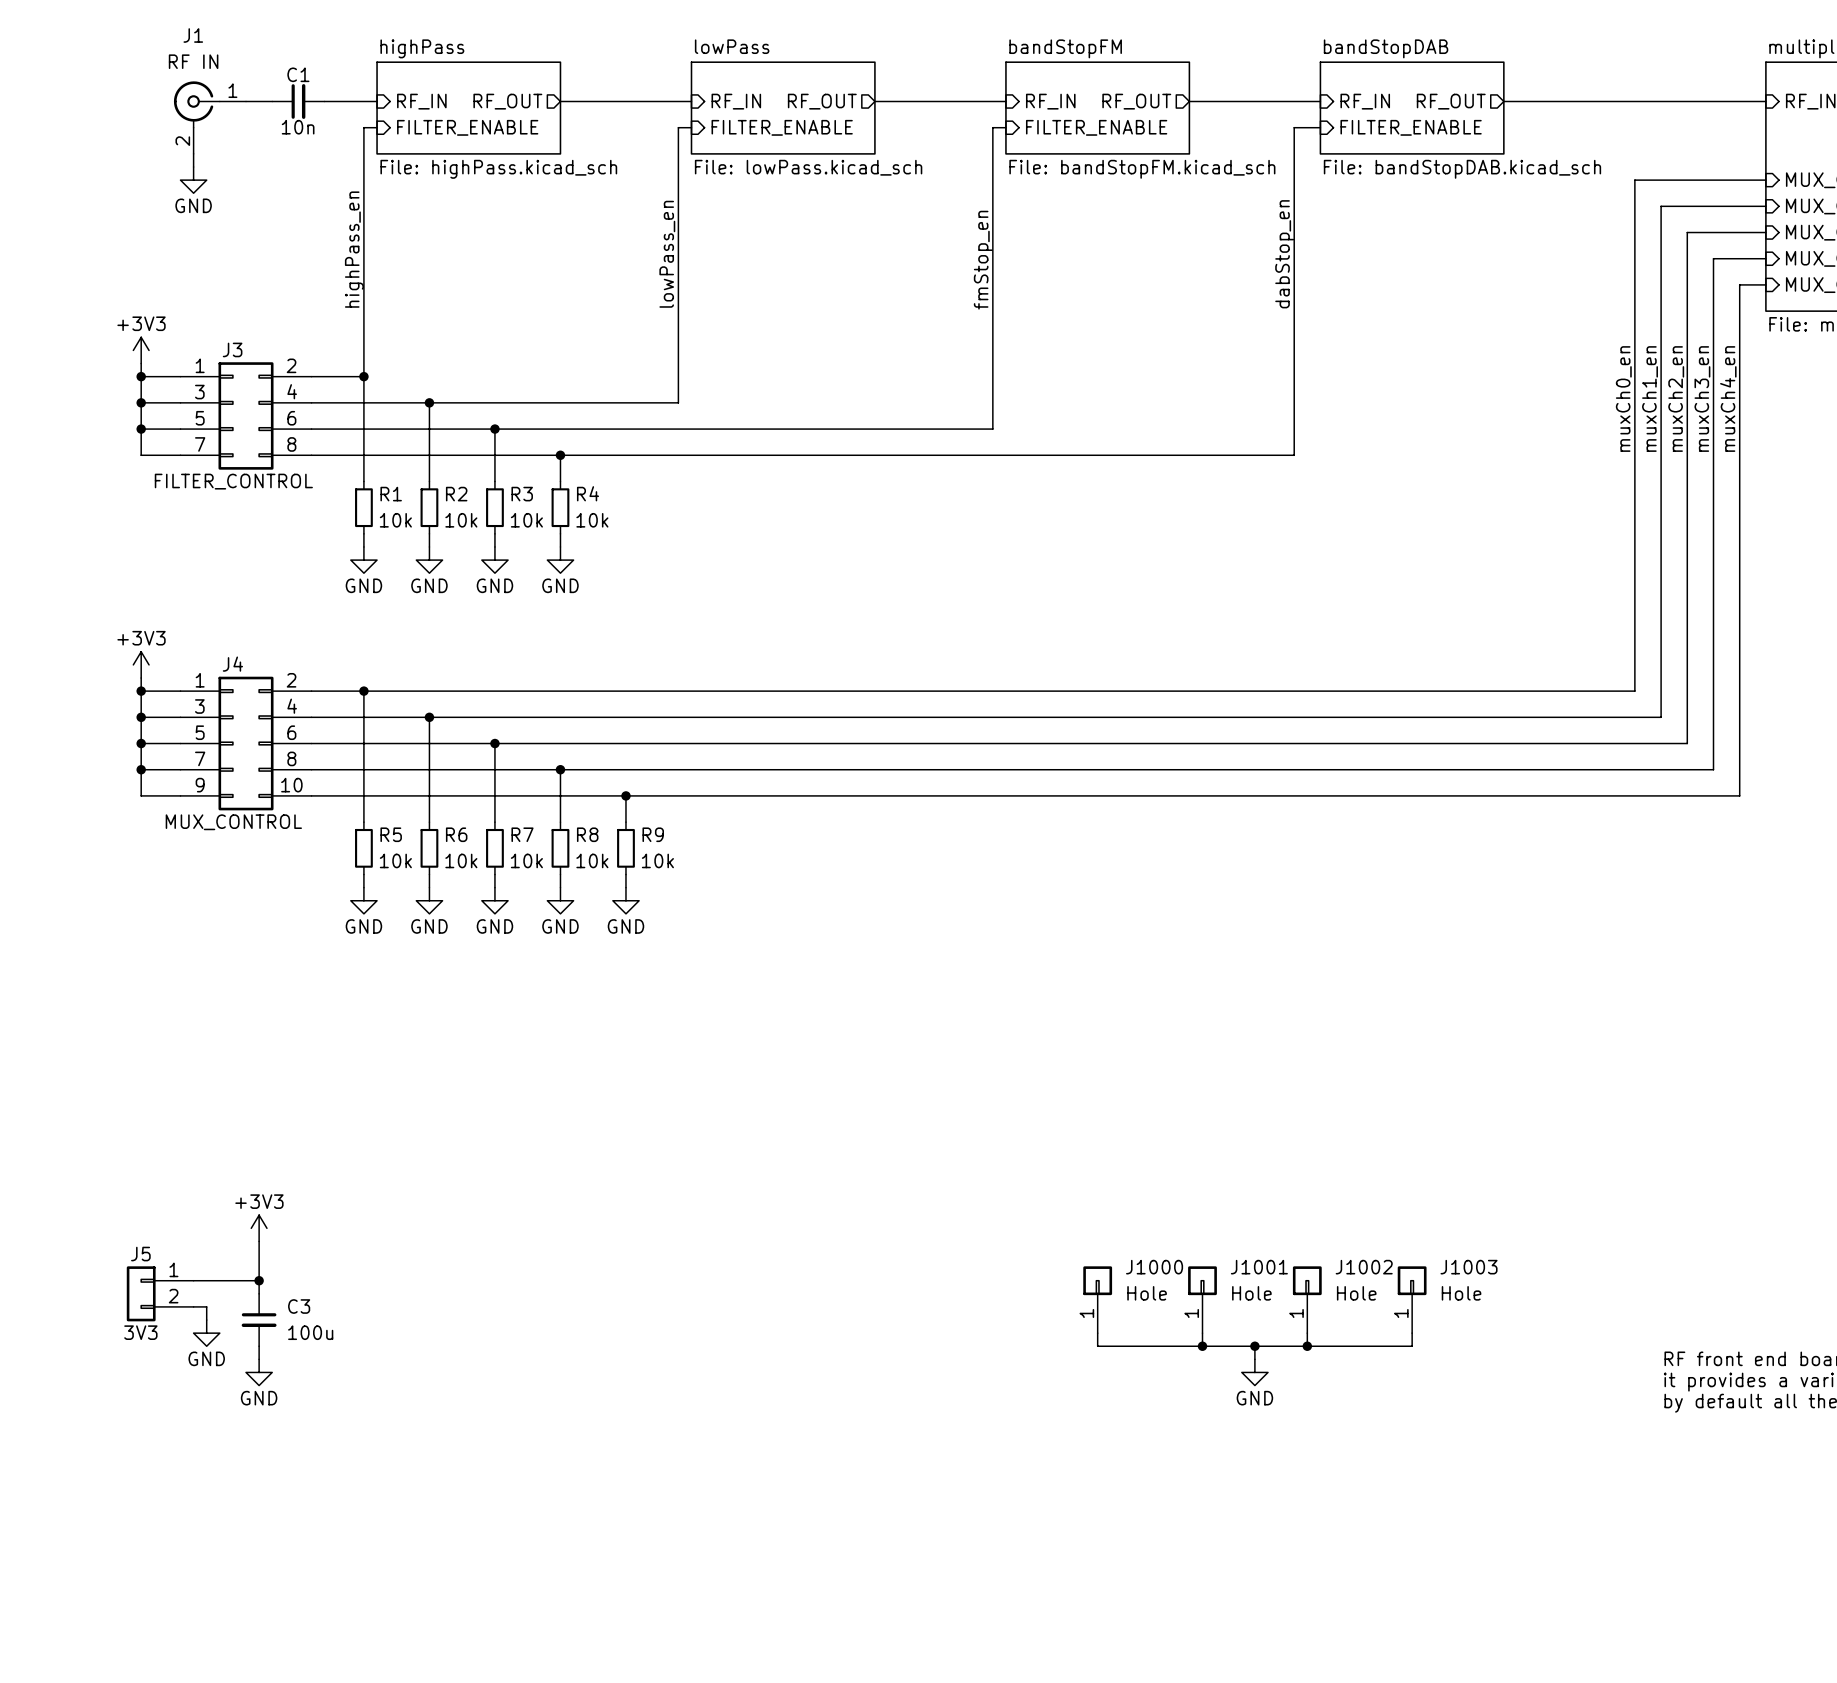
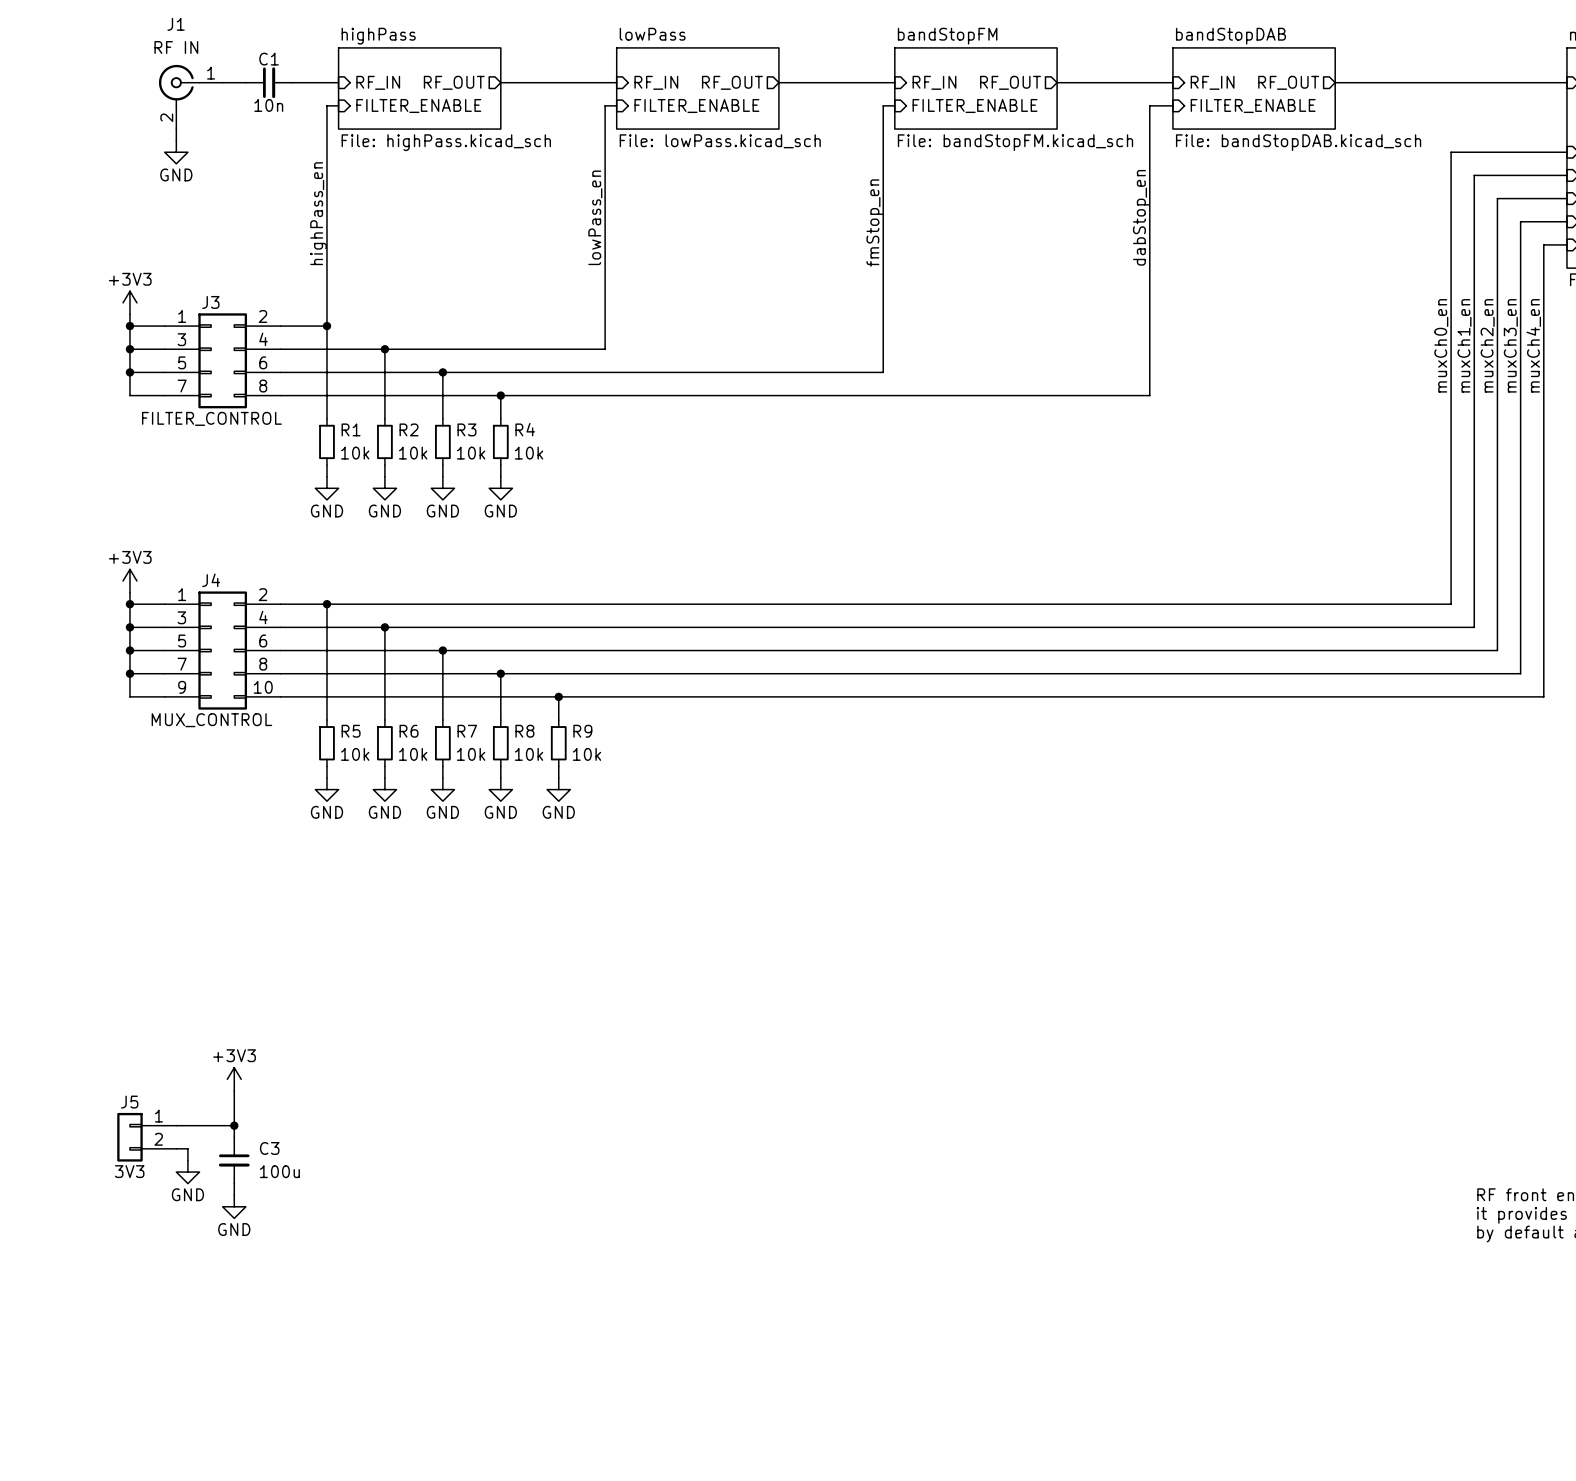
J1000: Hole (1097, 1299) -> none
J1001: Hole (1202, 1299) -> none
J1002: Hole (1307, 1299) -> none
J1003: Hole (1412, 1299) -> none
wire: (1097, 1333) (1097, 1346) (1412, 1346) (1412, 1333) -> none
wire: (1202, 1333) (1202, 1346) -> none
wire: (1307, 1333) (1307, 1346) -> none
junction: (1202, 1346) -> none
wire: (1254, 1346) (1254, 1359) -> none
junction: (1254, 1346) -> none
junction: (1307, 1346) -> none
power symbol: GND (1254, 1372) -> none

